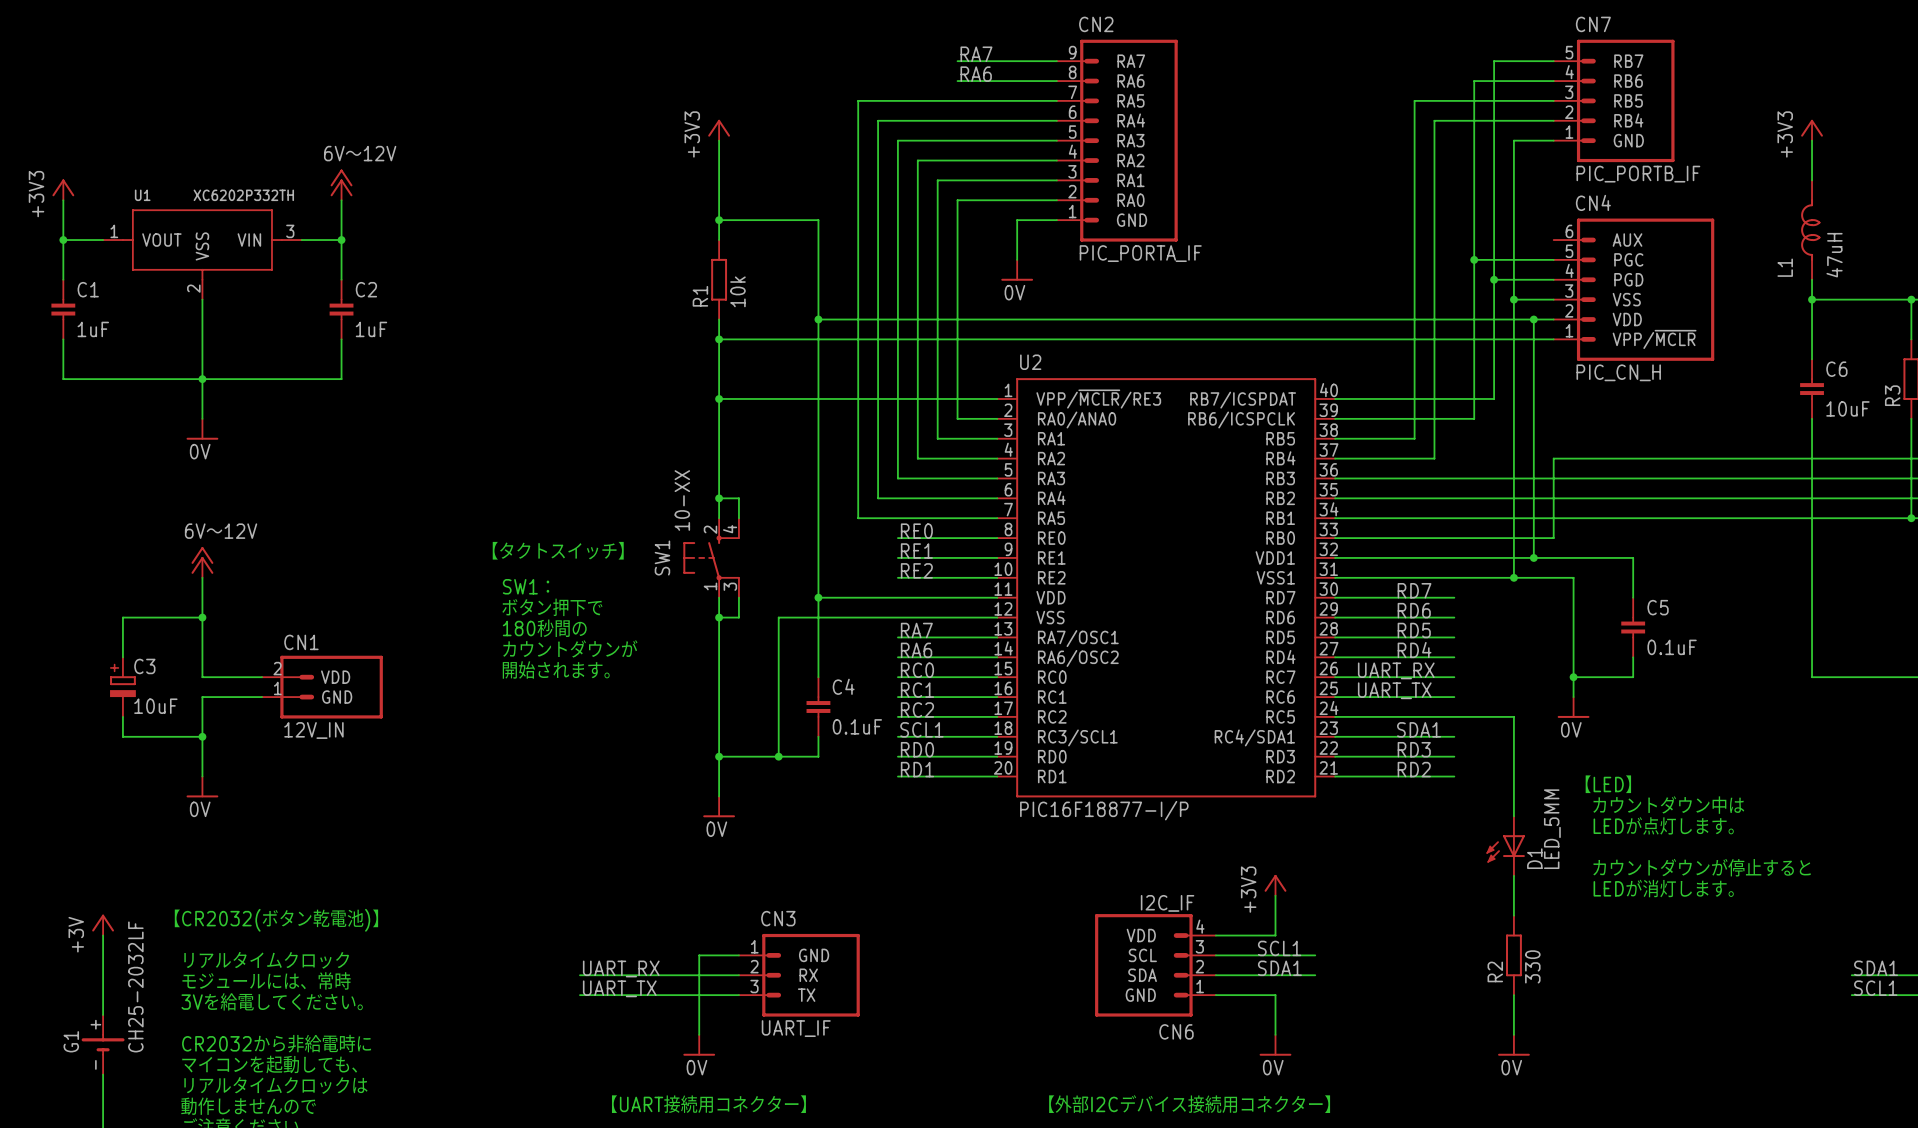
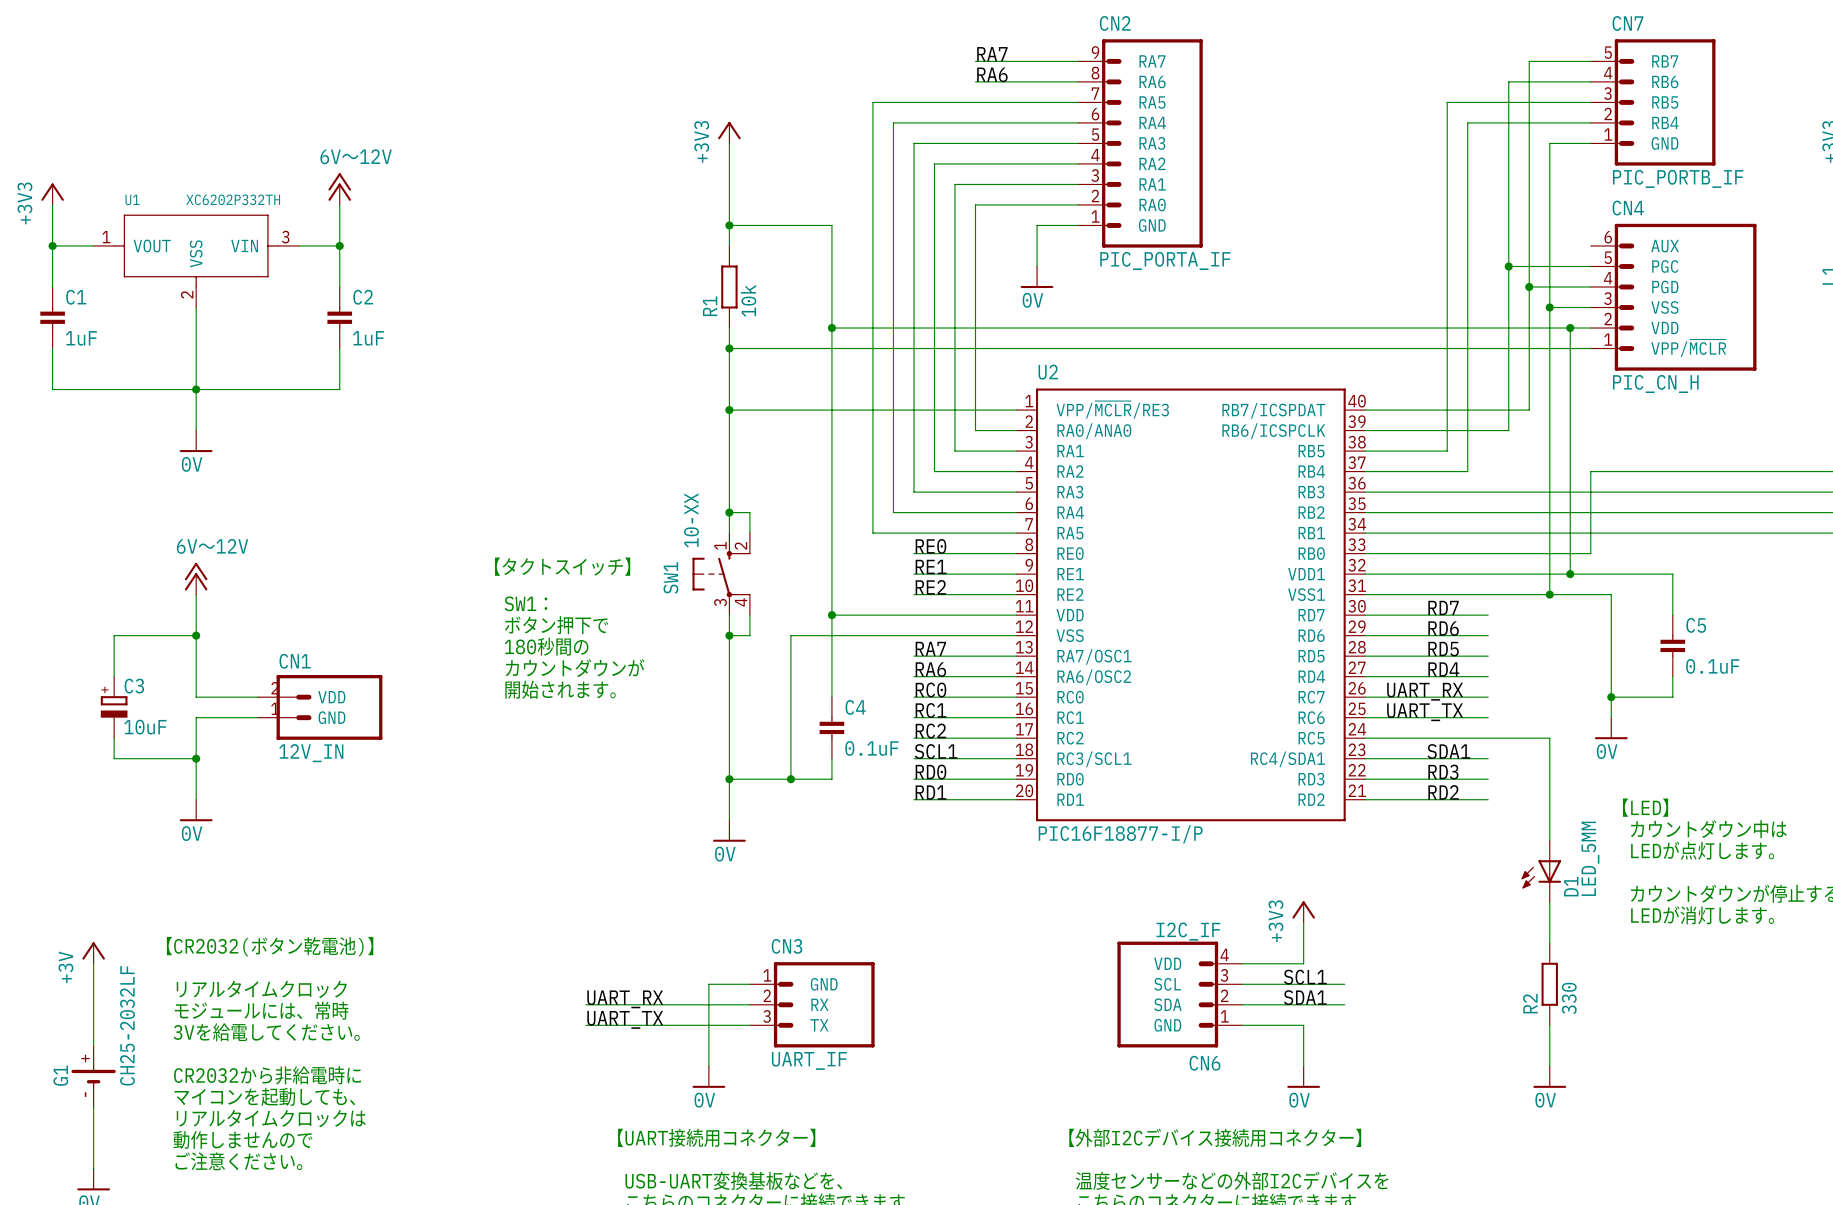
SW1 pin number: 2 (710, 529) -> 1 (720, 545)
SW1 pin number: 4 (730, 529) -> 2 (740, 545)
SW1 pin number: 1 (710, 586) -> 3 (720, 602)
SW1 pin number: 3 (730, 586) -> 4 (741, 602)

